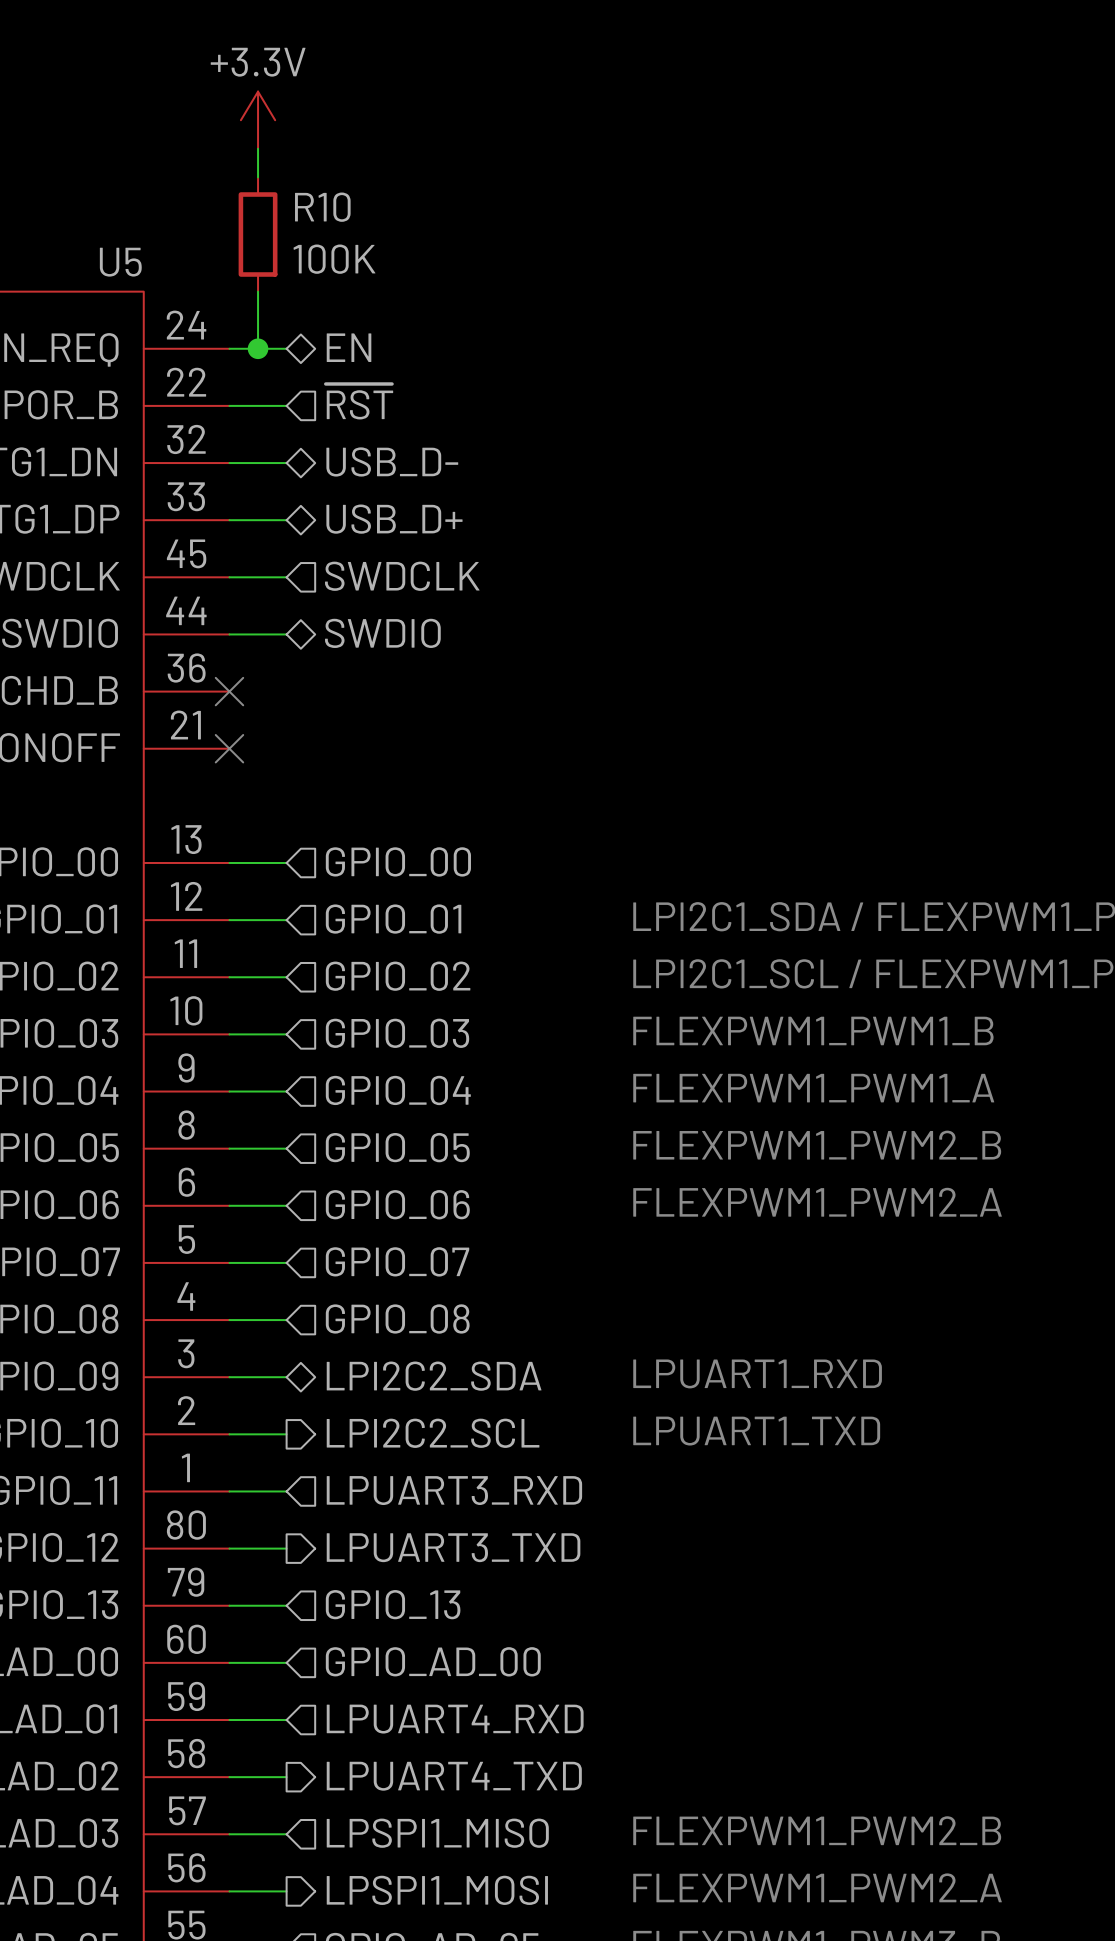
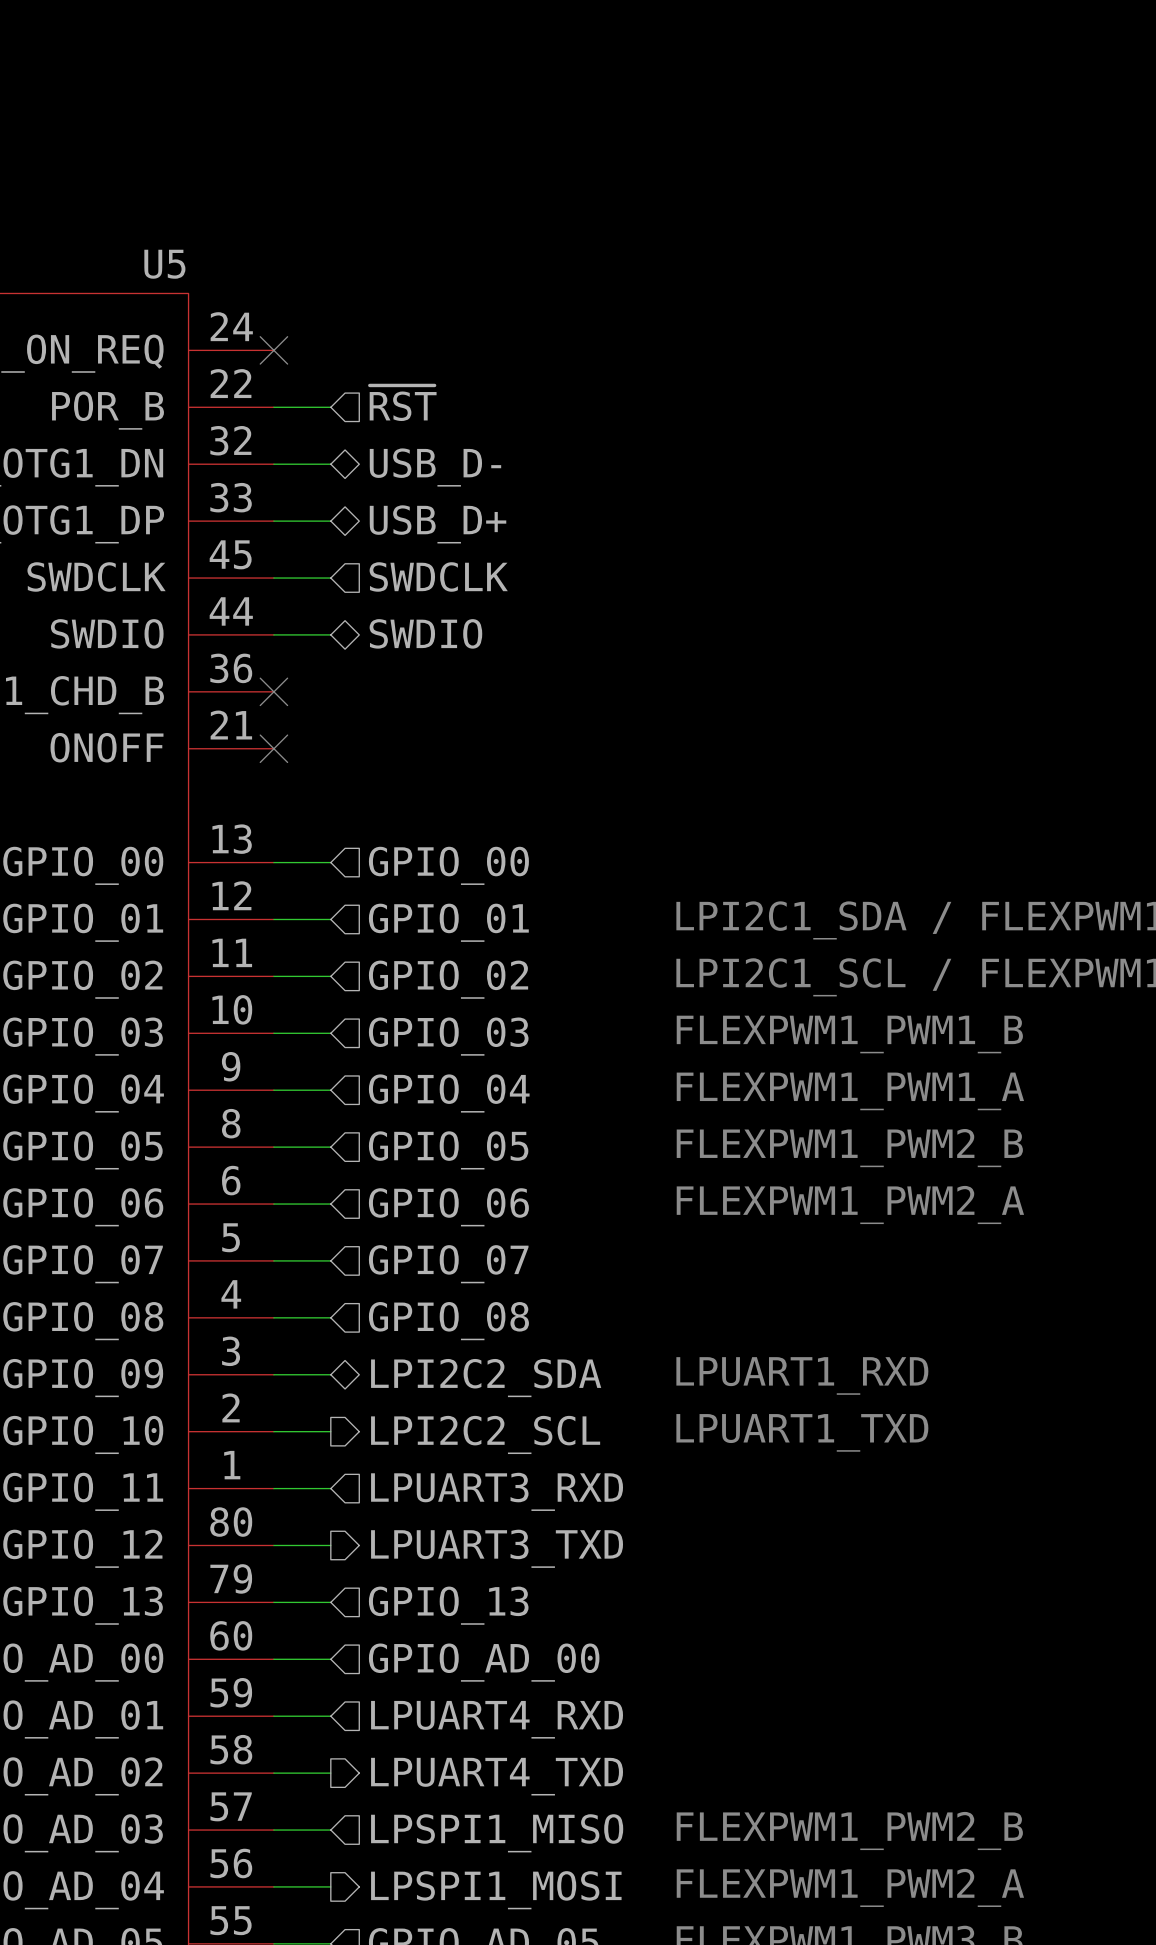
power symbol: +3.3V (258, 120) -> none
wire: (258, 148) (258, 177) -> none
R10: 100K (258, 234) -> none
wire: (258, 291) (258, 348) -> none
hierarchical label: EN (349, 347) -> none
wire: (229, 348) (286, 348) -> none
no-connect mark: none -> (273, 350)
junction: (258, 348) -> none

